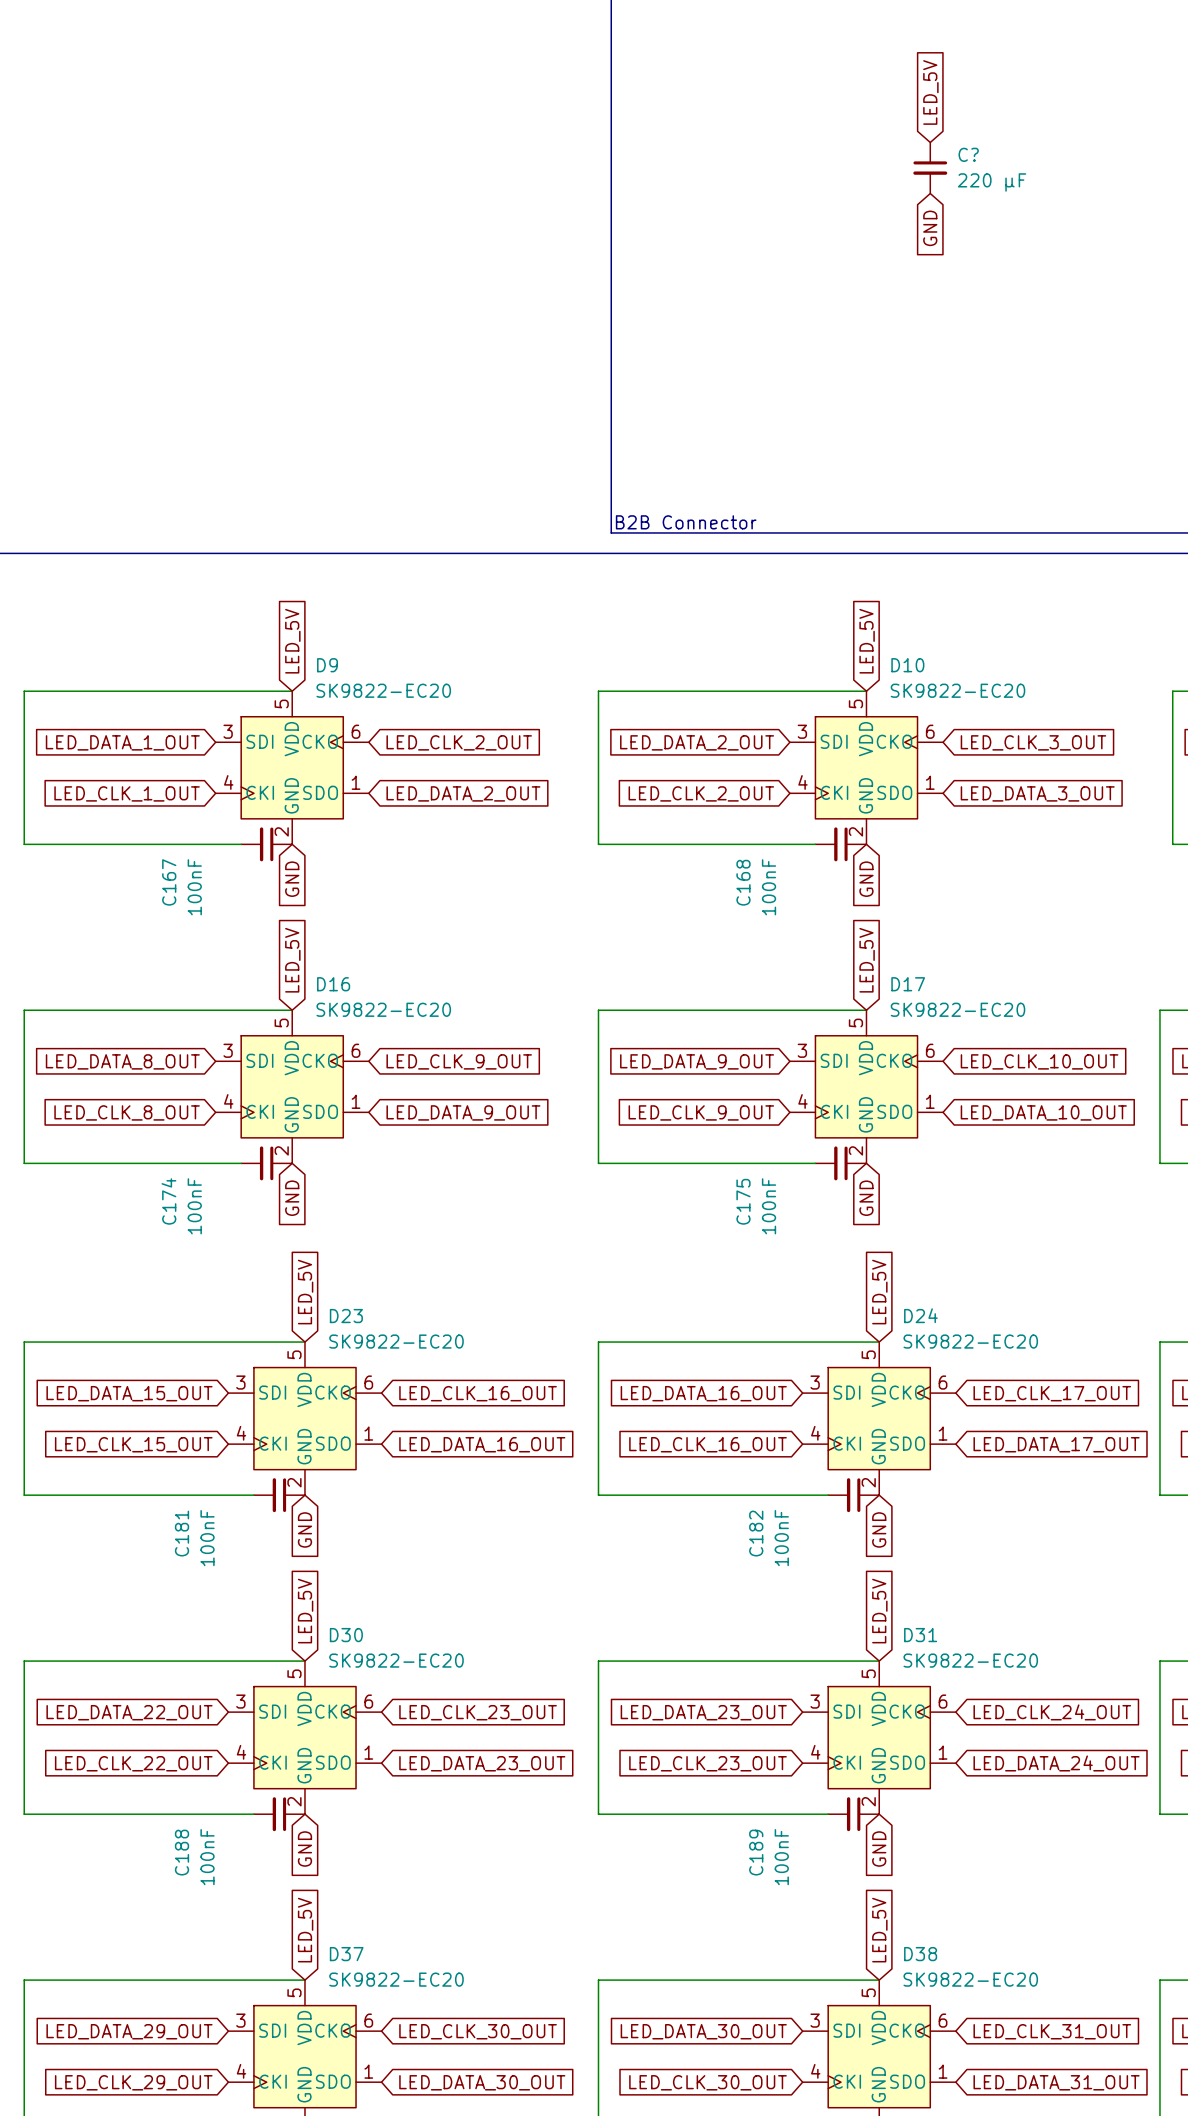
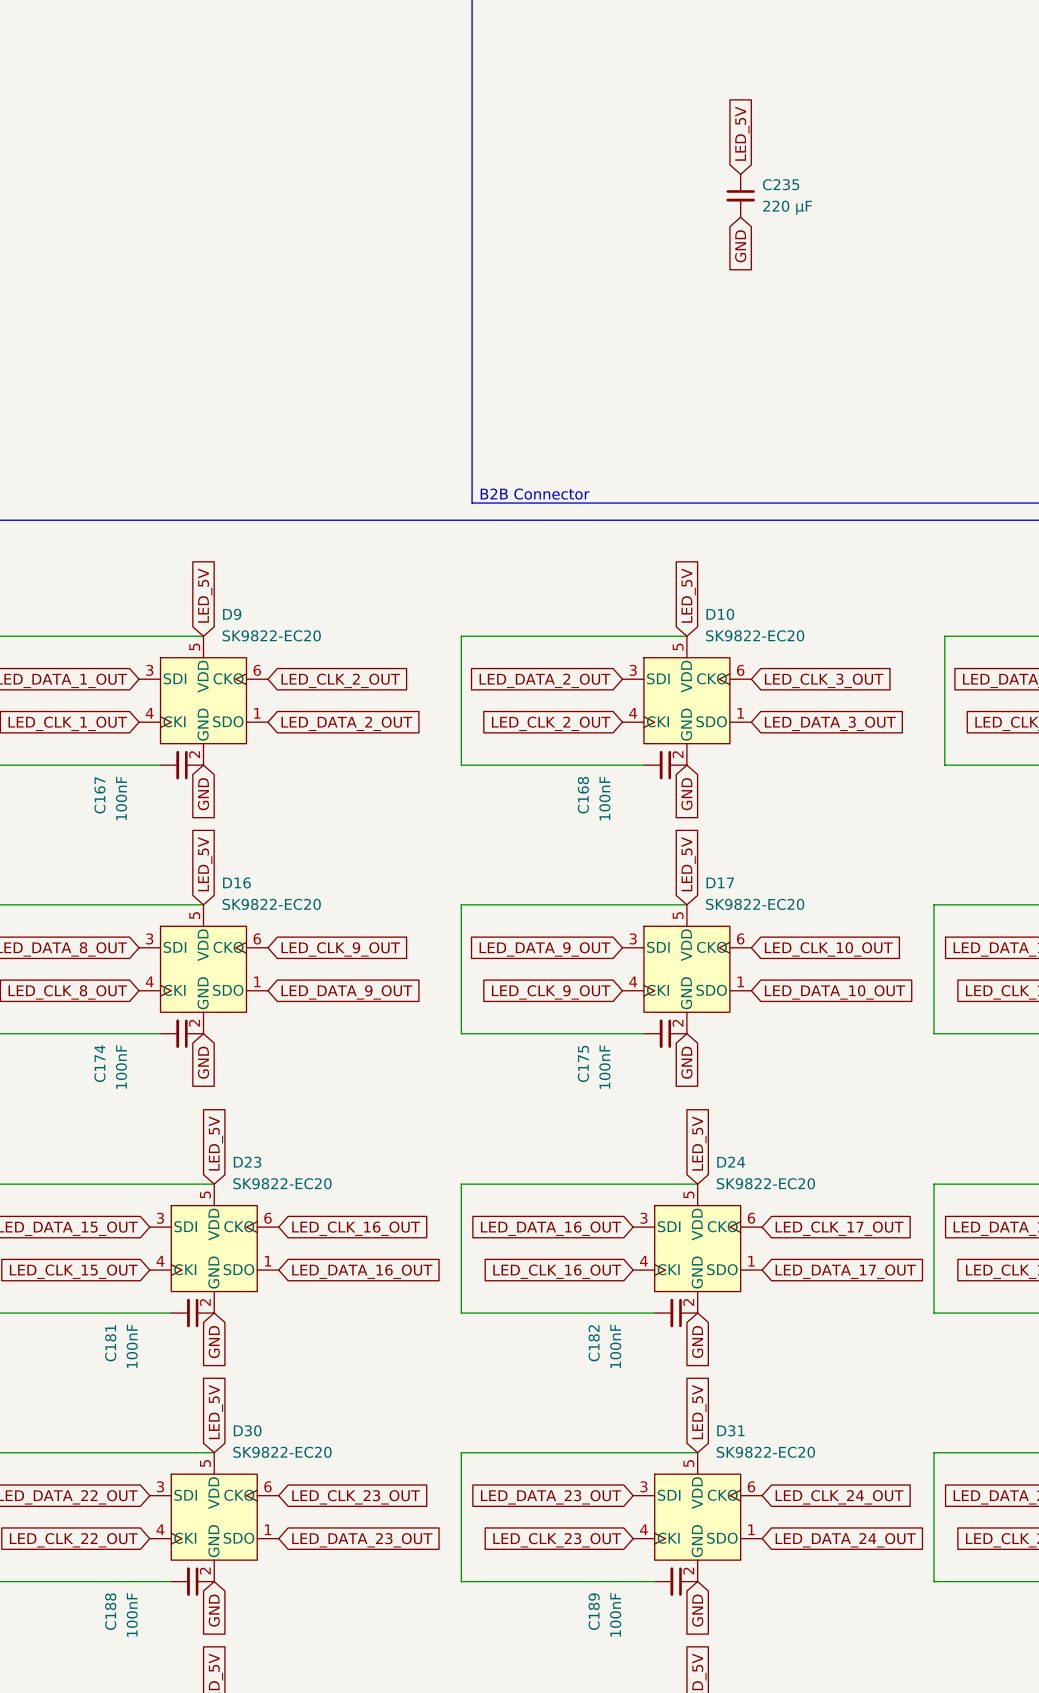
C? name: C? (968, 154) -> C235 (781, 184)

